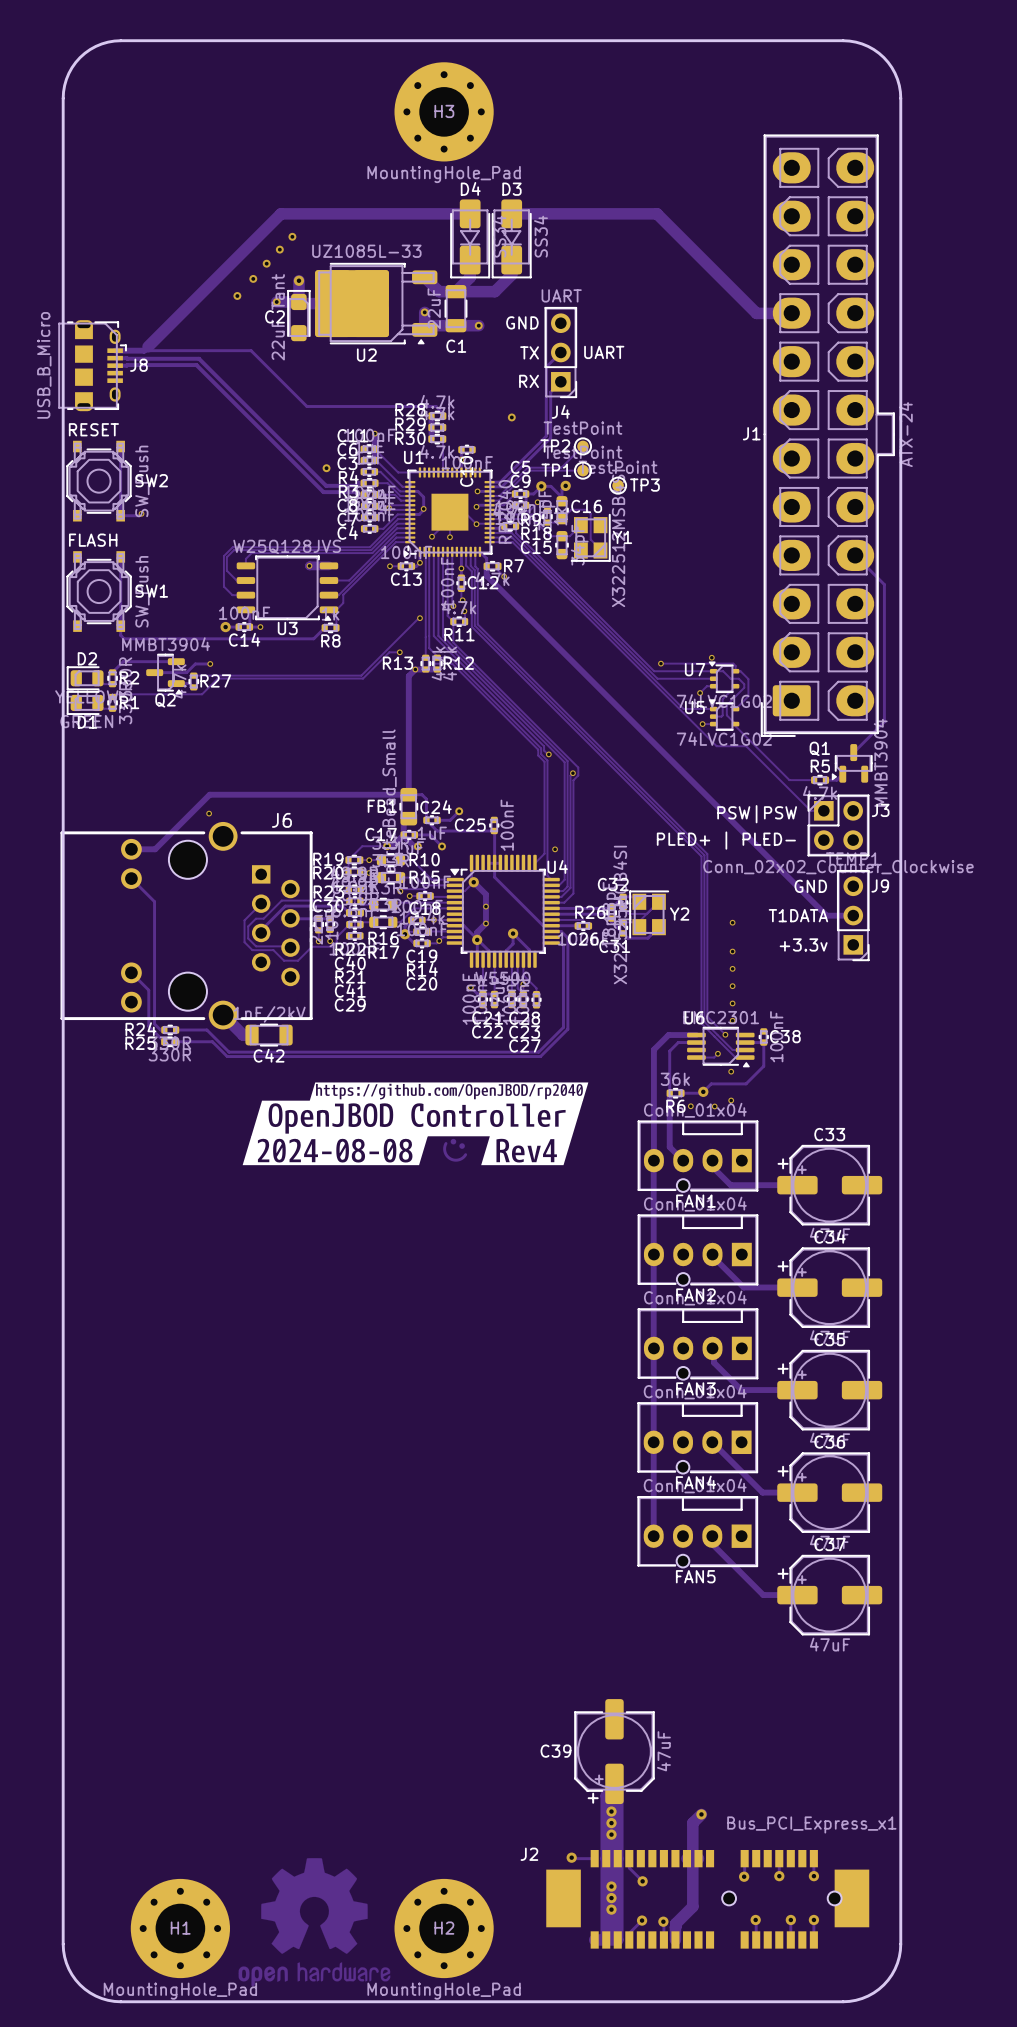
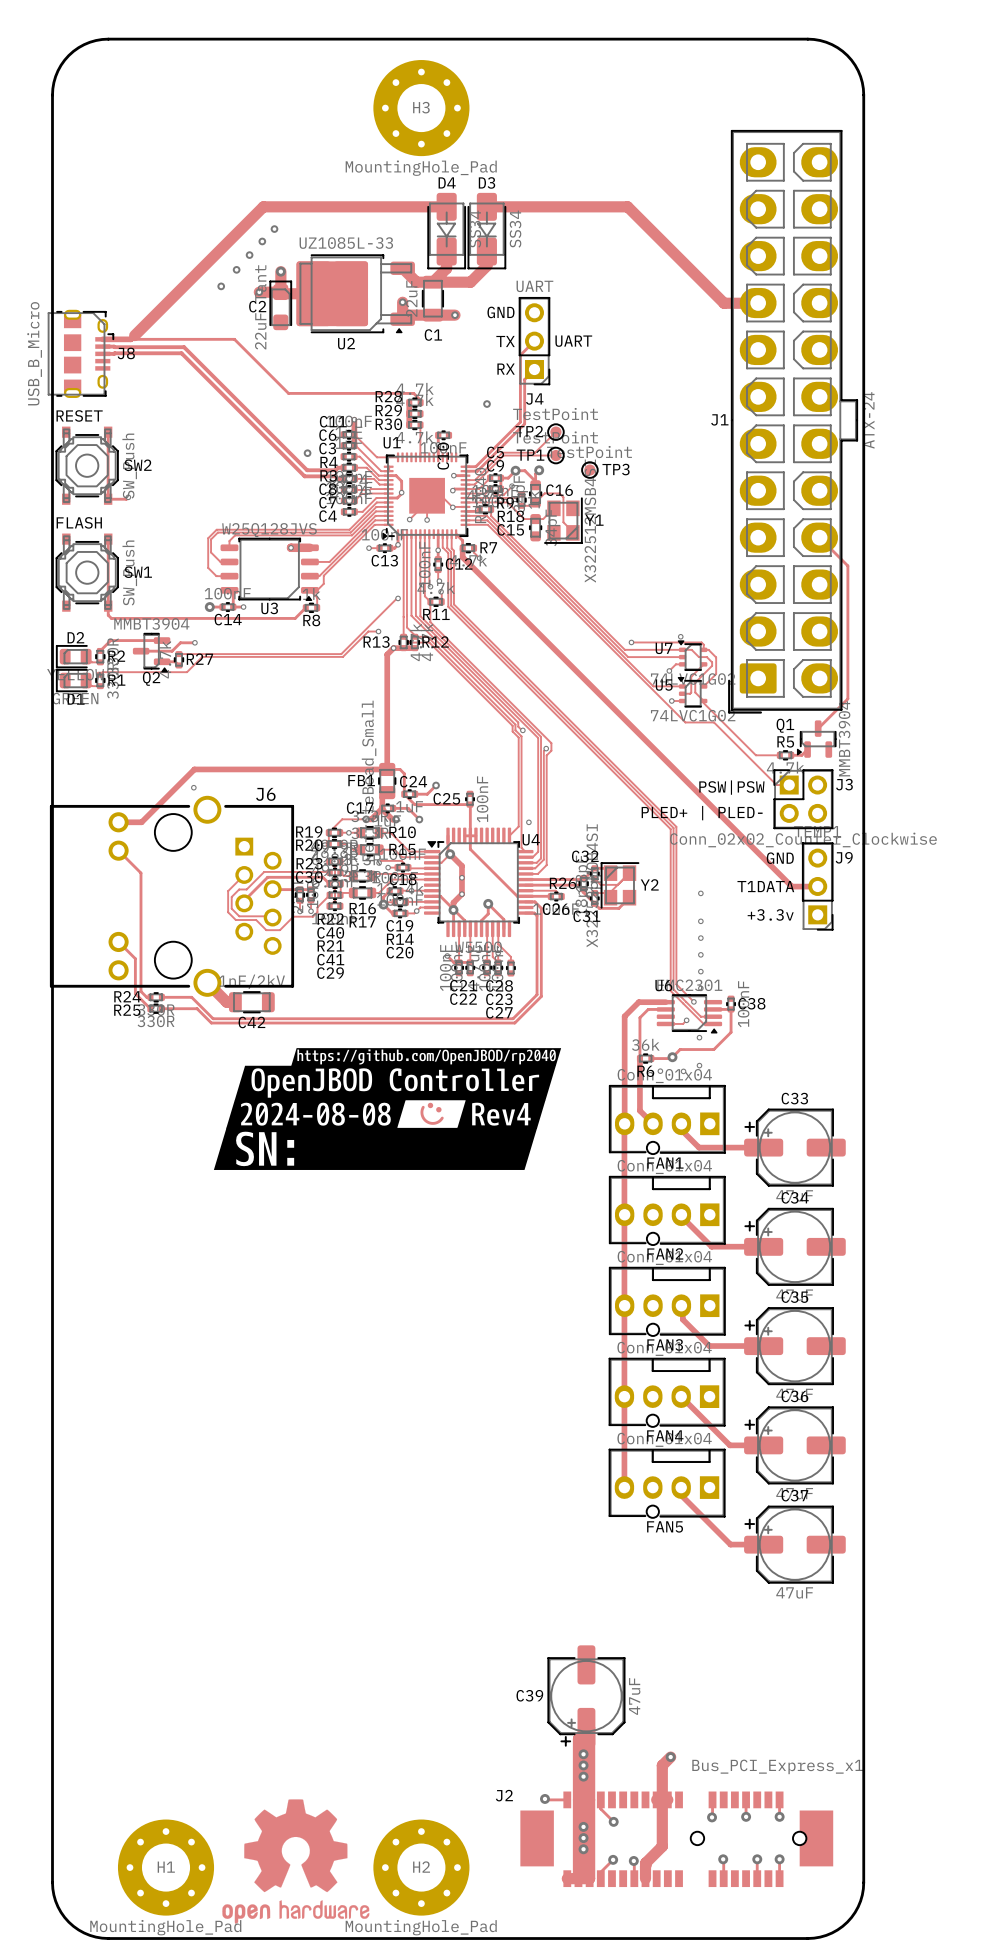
drawing: none -> [213, 1127, 538, 1170]

